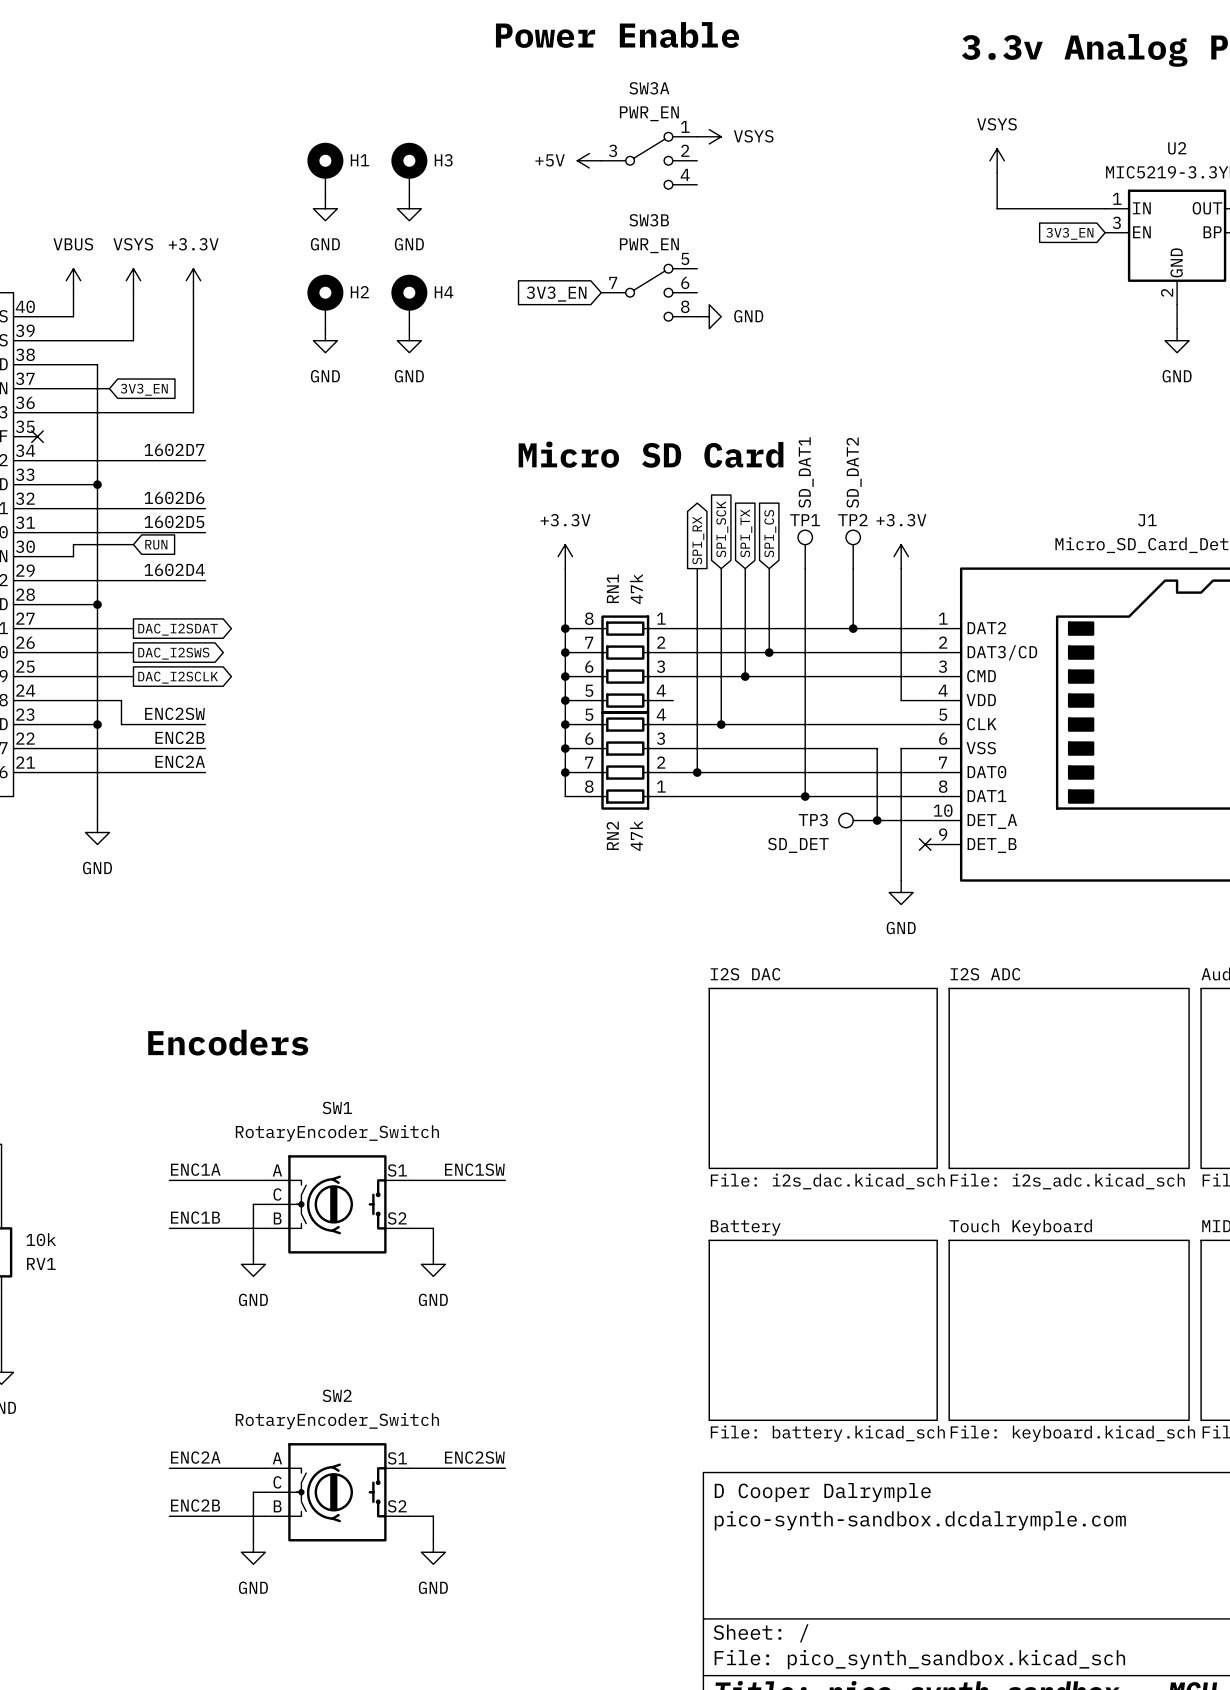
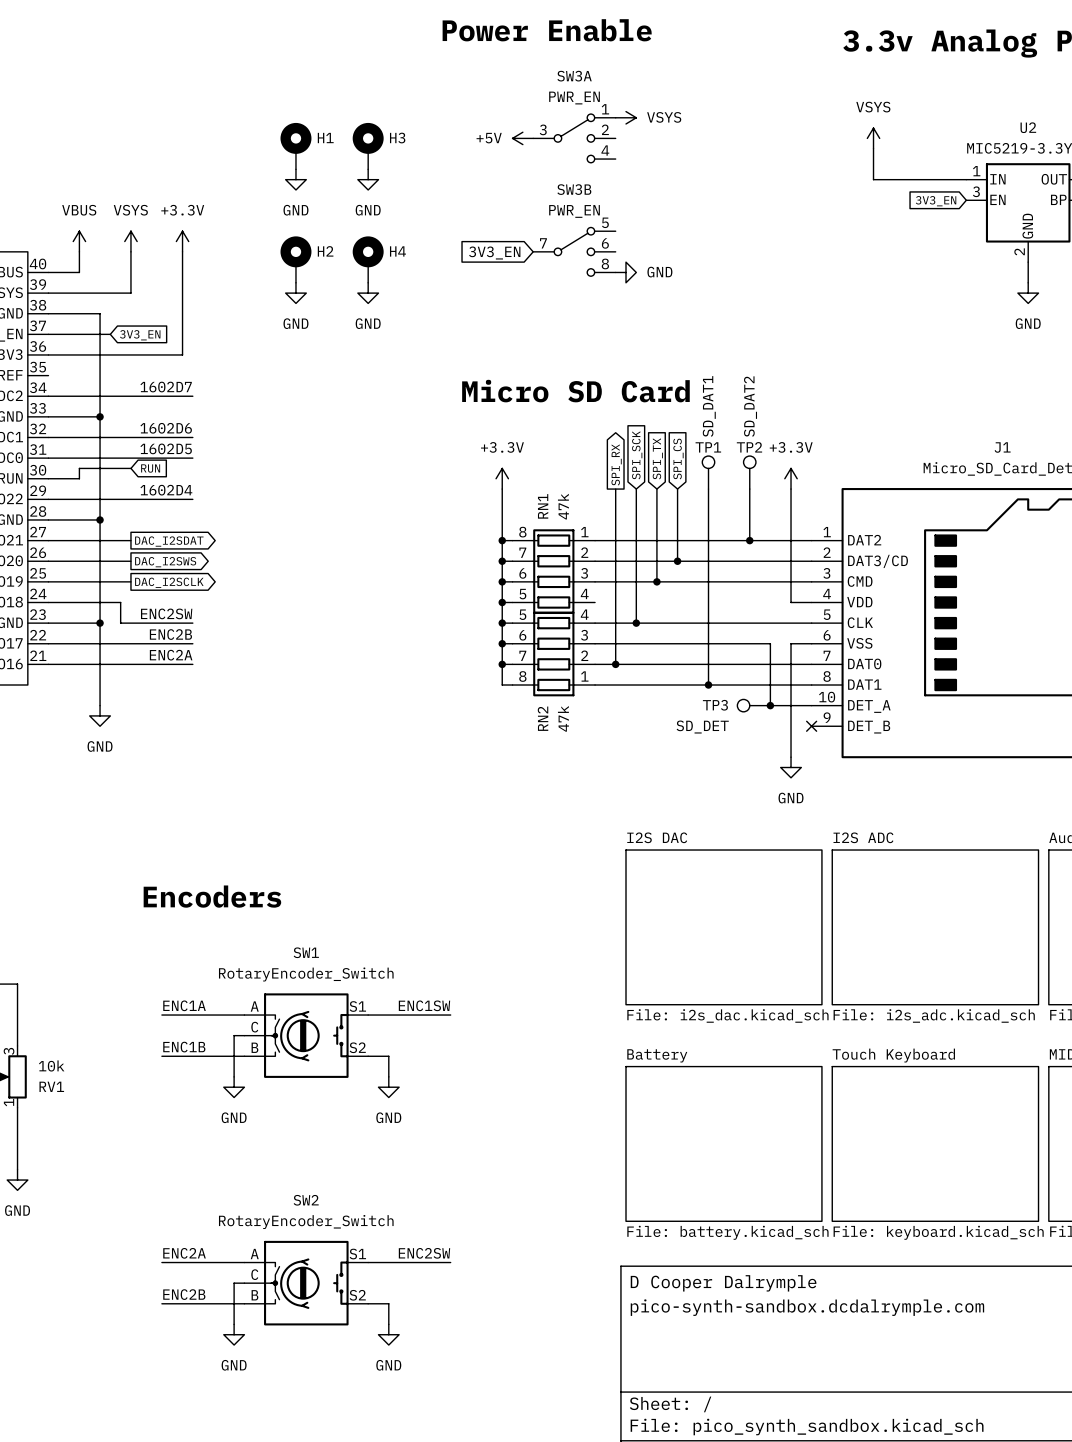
no-connect mark: (37, 436) -> none

